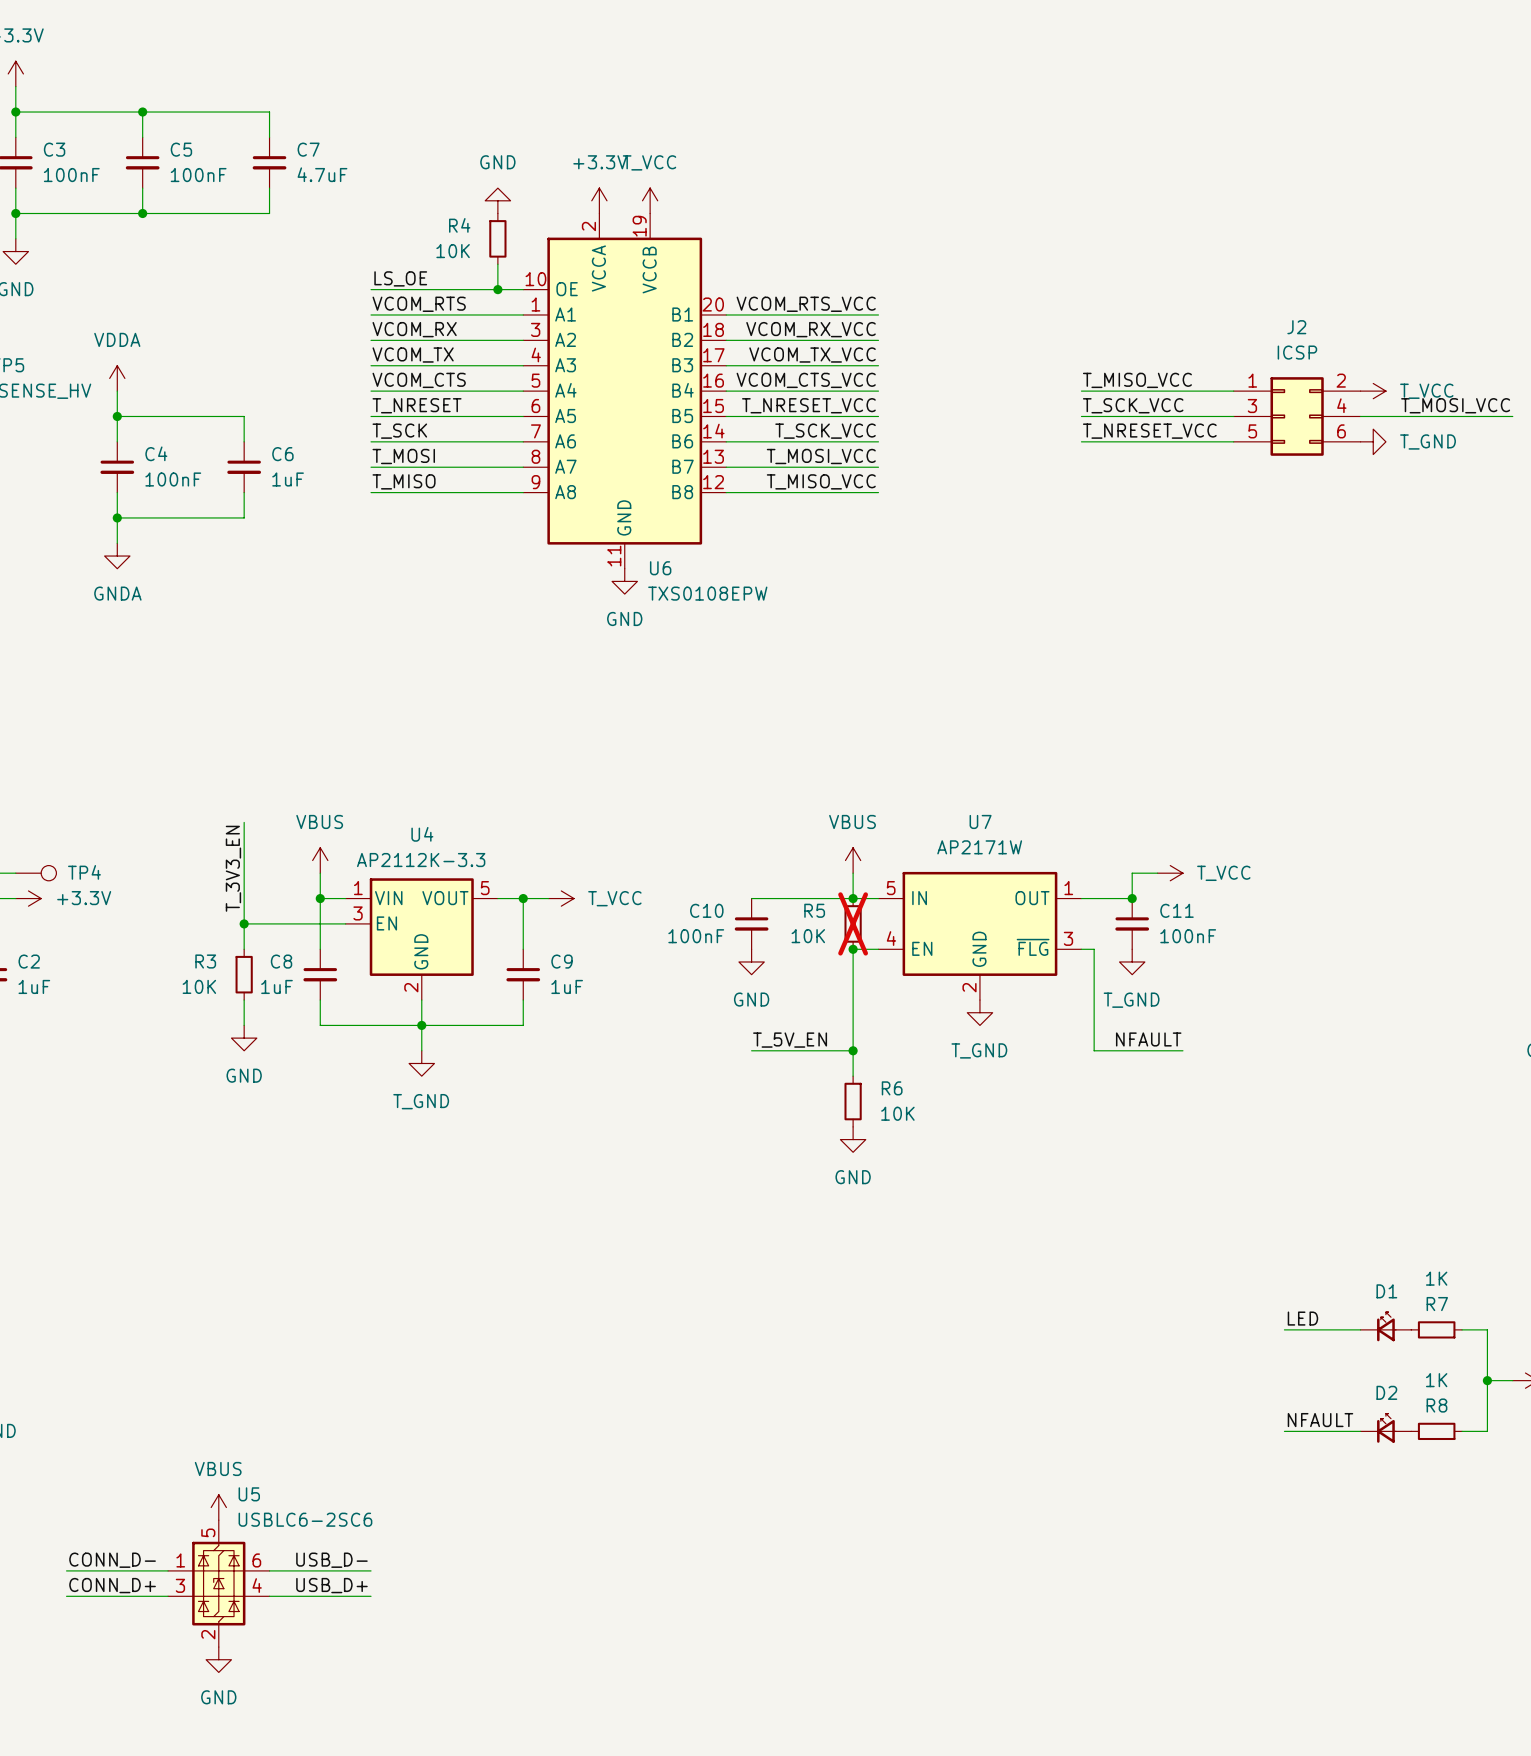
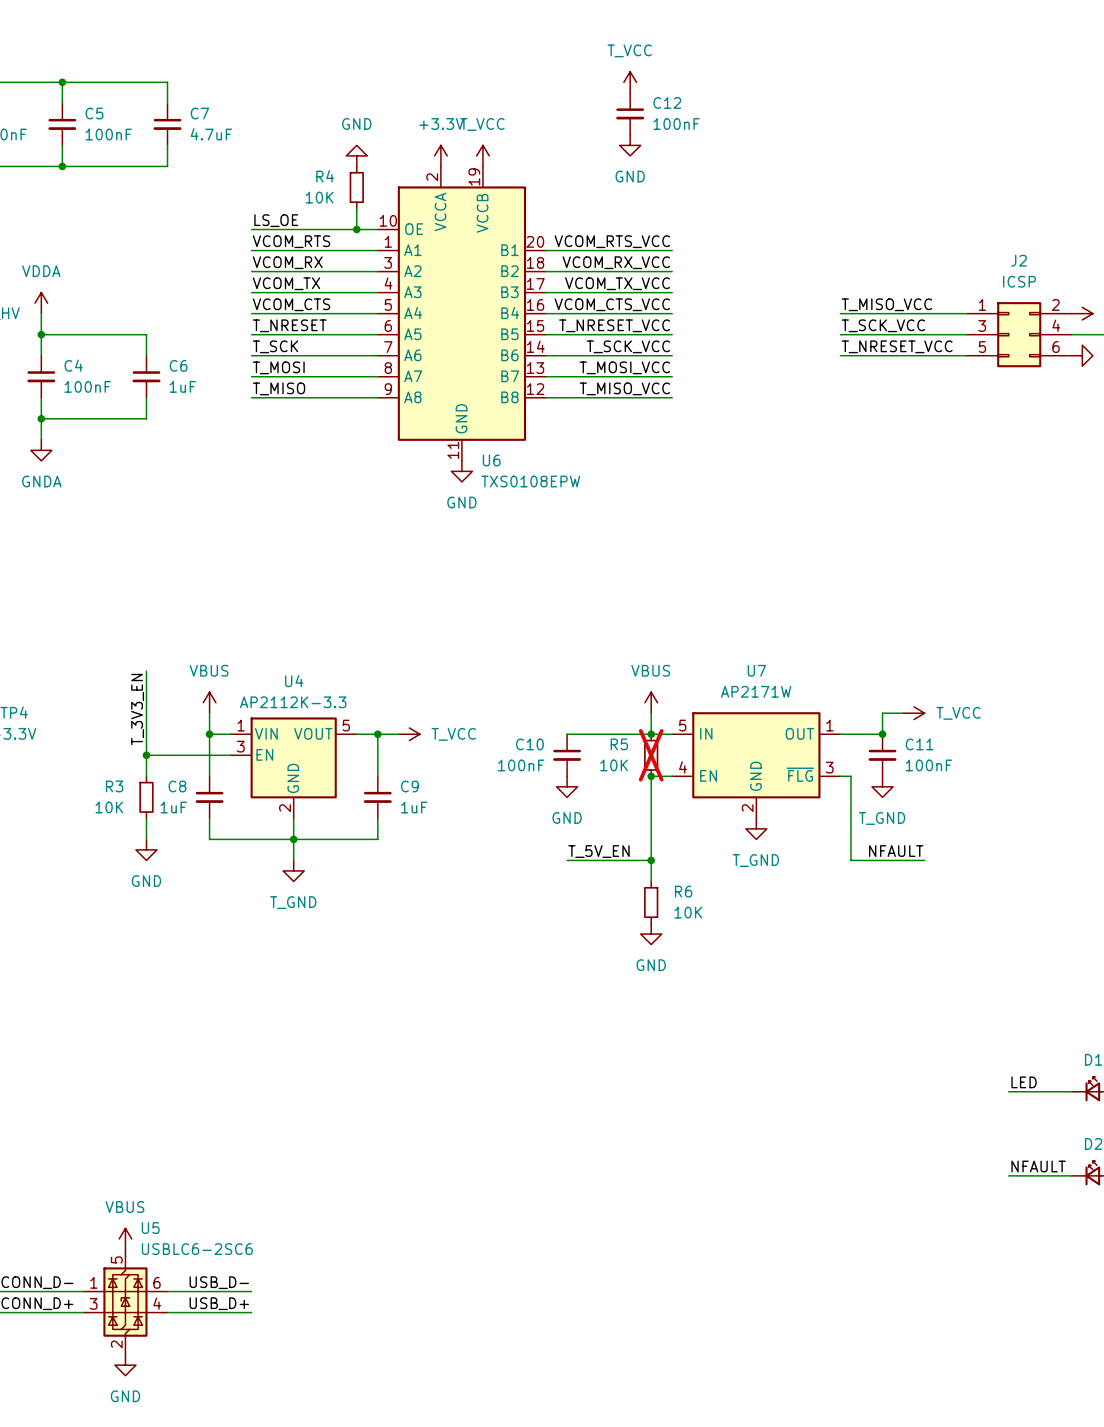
power symbol: none -> T_VCC (630, 82)
C12: none -> 100nF (630, 113)
power symbol: none -> GND (630, 145)

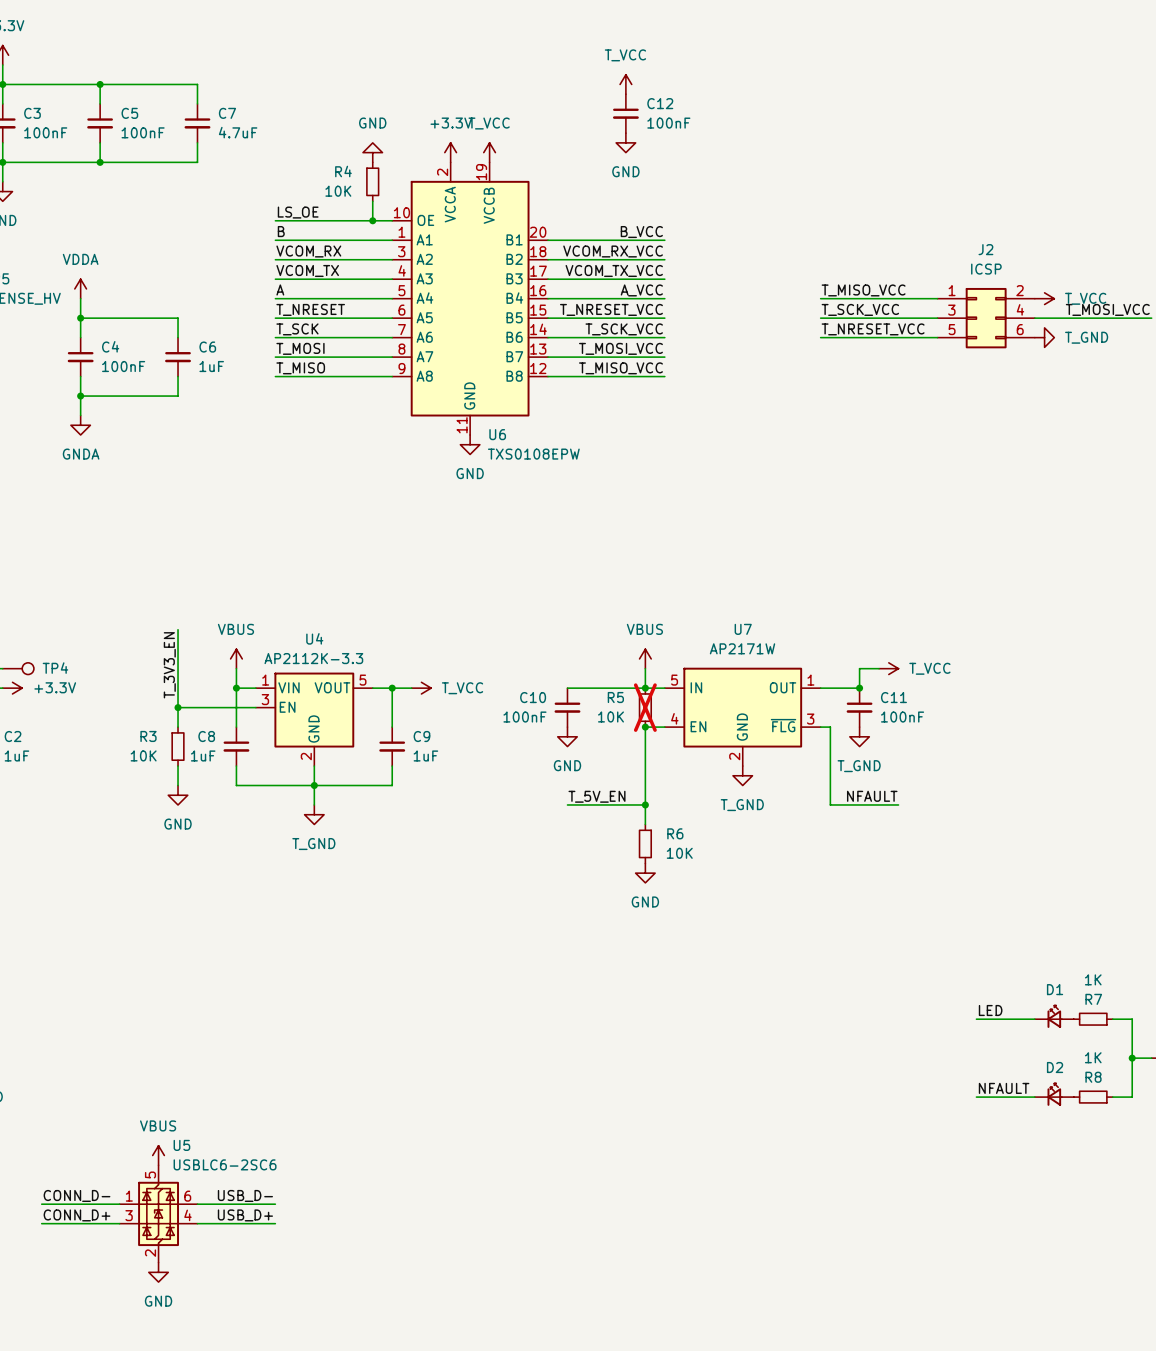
label: VCOM_RTS (291, 241) -> B (281, 231)
label: VCOM_RTS_VCC (612, 241) -> B_VCC (641, 232)
label: VCOM_CTS (291, 304) -> A (280, 289)
label: VCOM_CTS_VCC (612, 304) -> A_VCC (641, 290)

